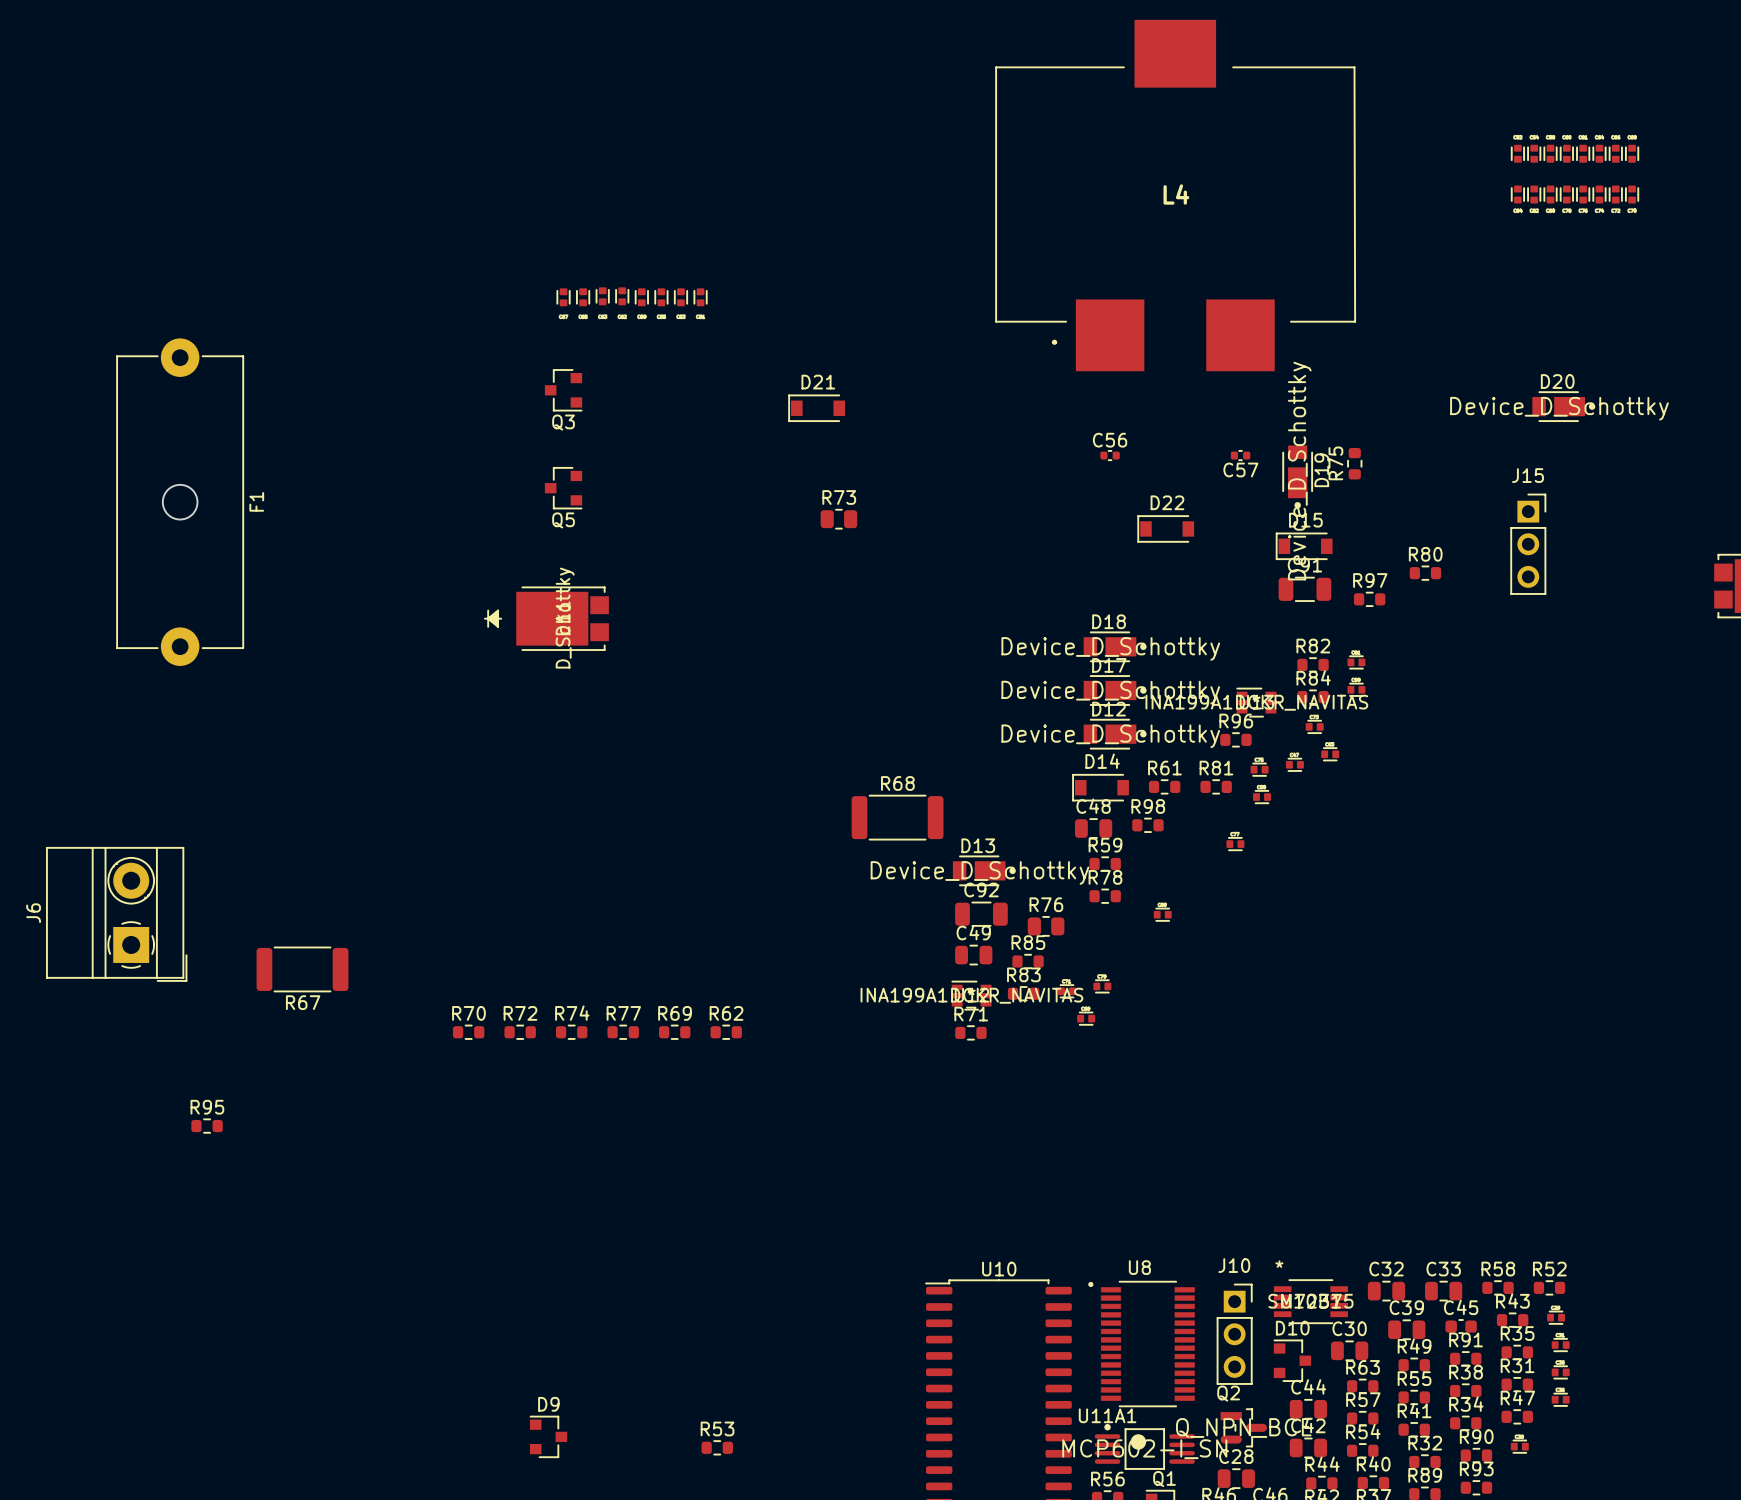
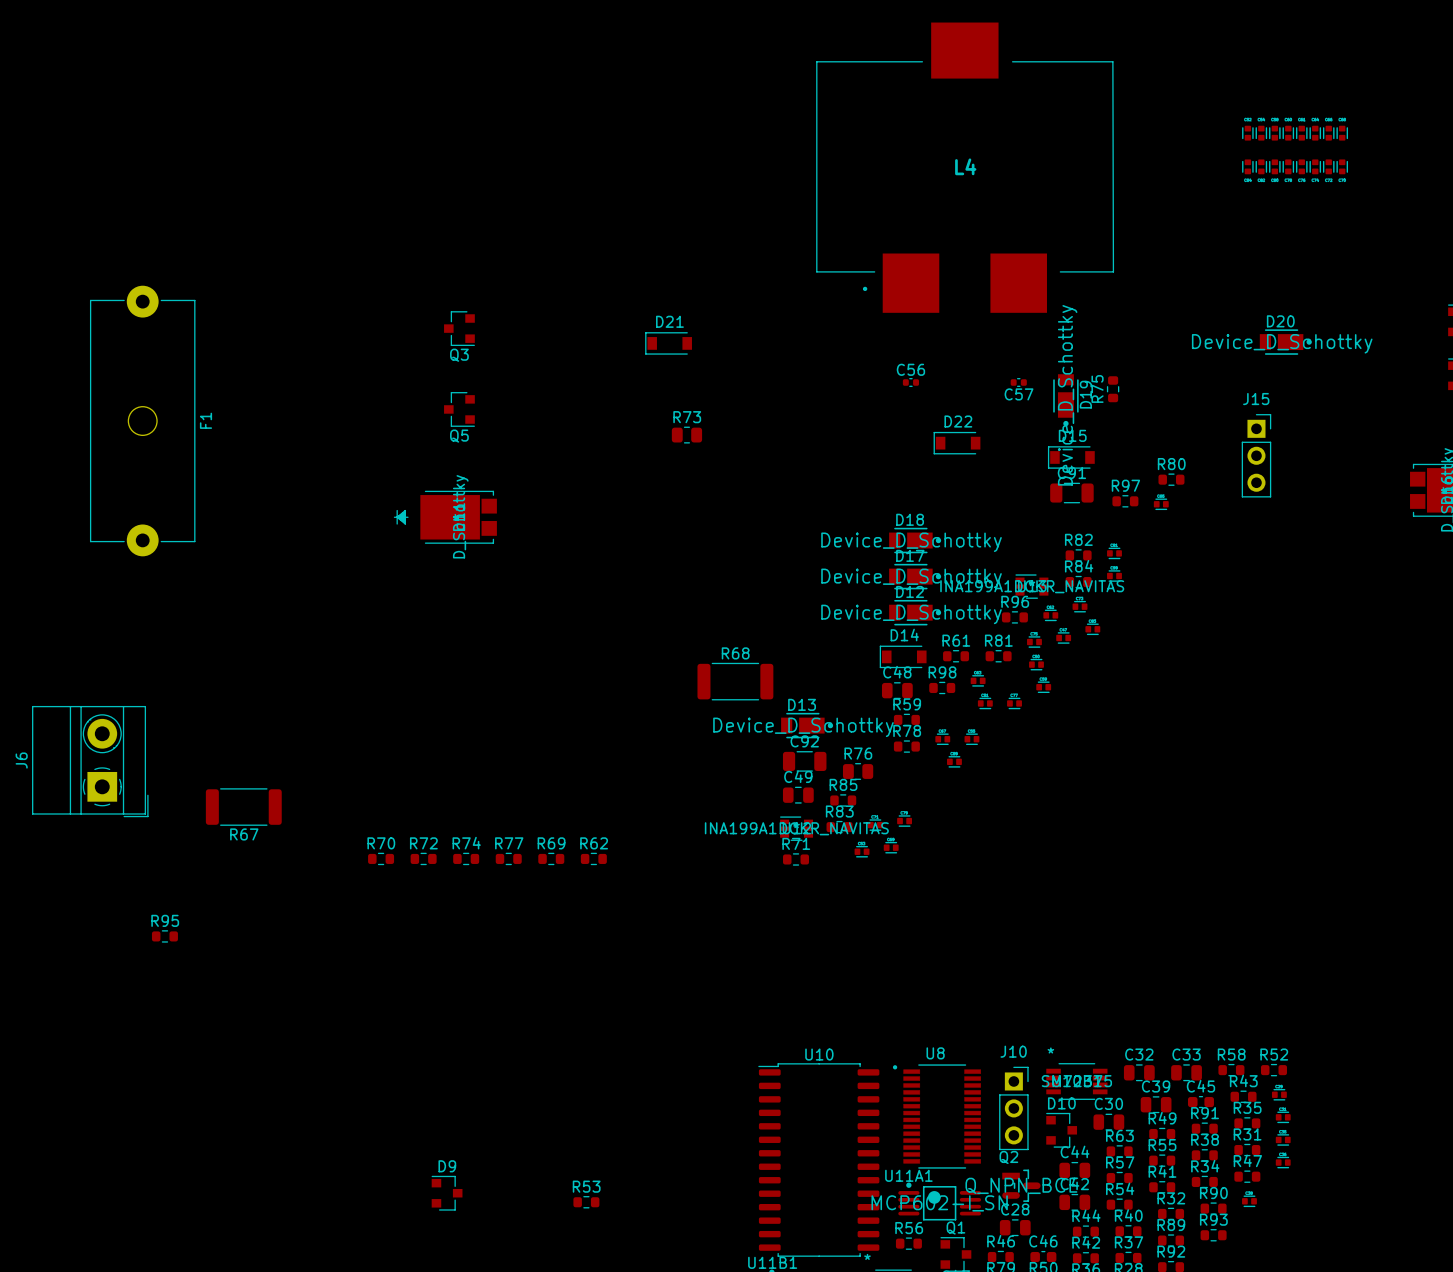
part rotation: 0° (602, 296) -> 90° clockwise (978, 680)
part position: (602, 296) -> (978, 680)
part rotation: 0° (622, 296) -> 90° clockwise (1050, 615)
part position: (622, 296) -> (1050, 615)
part rotation: 0° (563, 297) -> 90° clockwise (942, 739)
part position: (563, 297) -> (942, 739)
part rotation: 0° (583, 297) -> 90° clockwise (1161, 504)
part position: (583, 297) -> (1161, 504)
part rotation: 0° (641, 297) -> 90° clockwise (1043, 687)
part position: (641, 297) -> (1043, 687)
part rotation: 0° (661, 297) -> 90° clockwise (971, 739)
part position: (661, 297) -> (971, 739)
part rotation: 0° (680, 297) -> 90° clockwise (862, 851)
part position: (680, 297) -> (862, 851)
part rotation: 0° (700, 297) -> 90° clockwise (985, 703)
part position: (700, 297) -> (985, 703)

